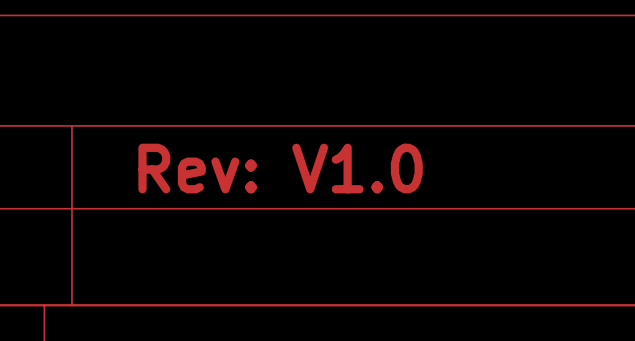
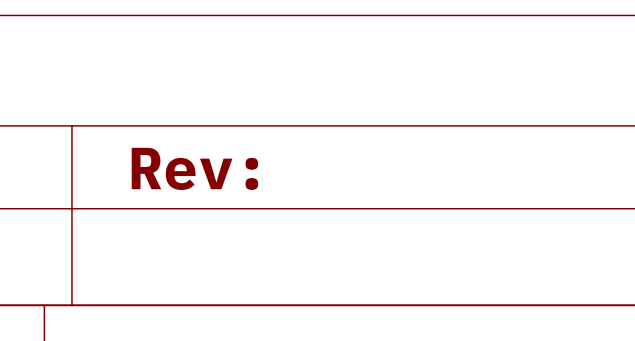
title block: Rev: V1.0 (280, 168) -> Rev: (194, 168)

